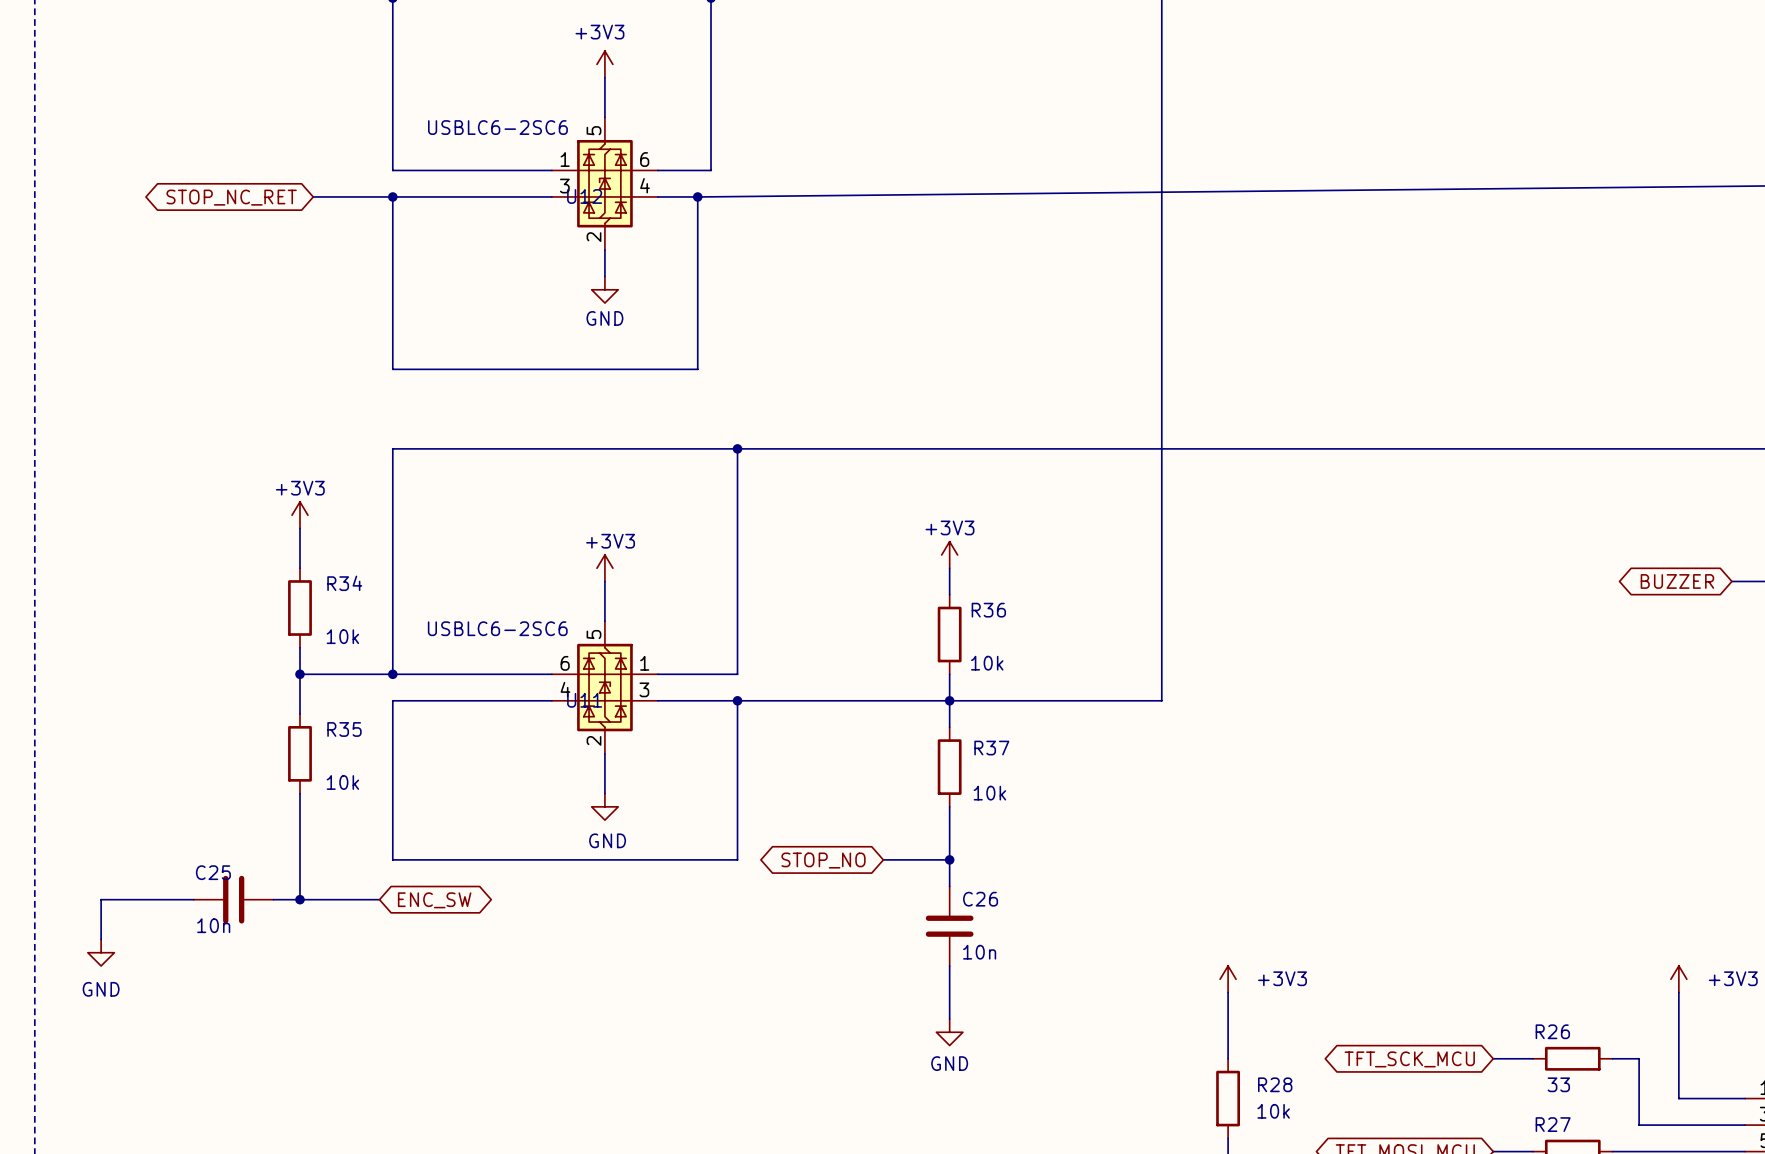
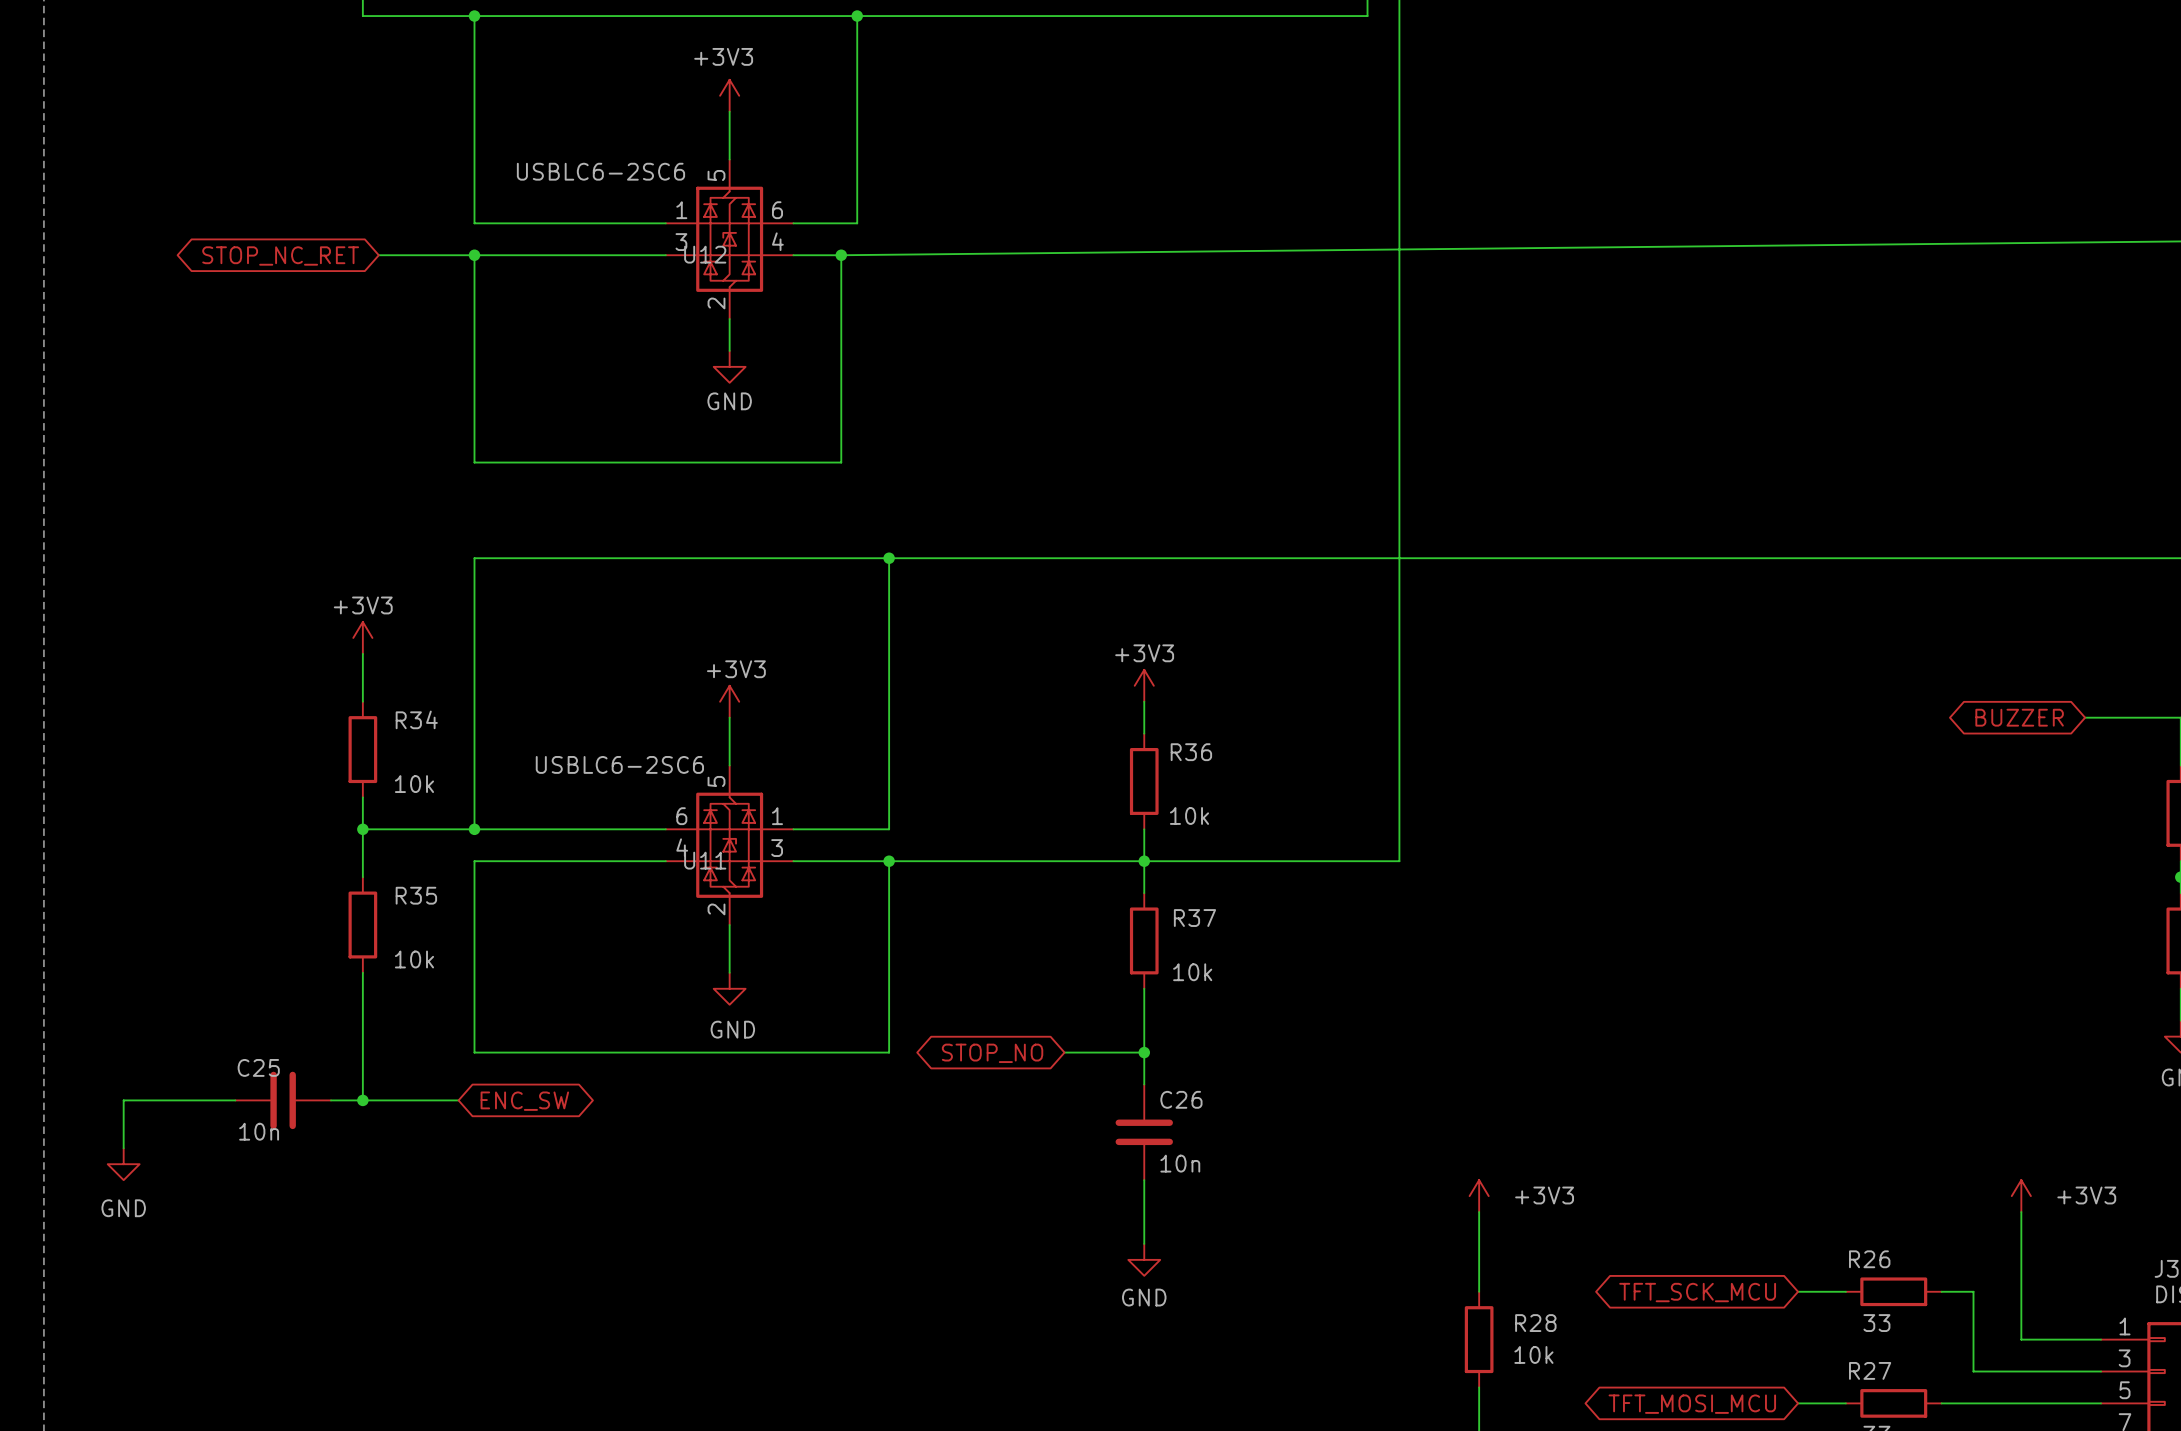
U11 value position: USBLC6-2SC6 (497, 628) -> USBLC6-2SC6 (619, 764)

